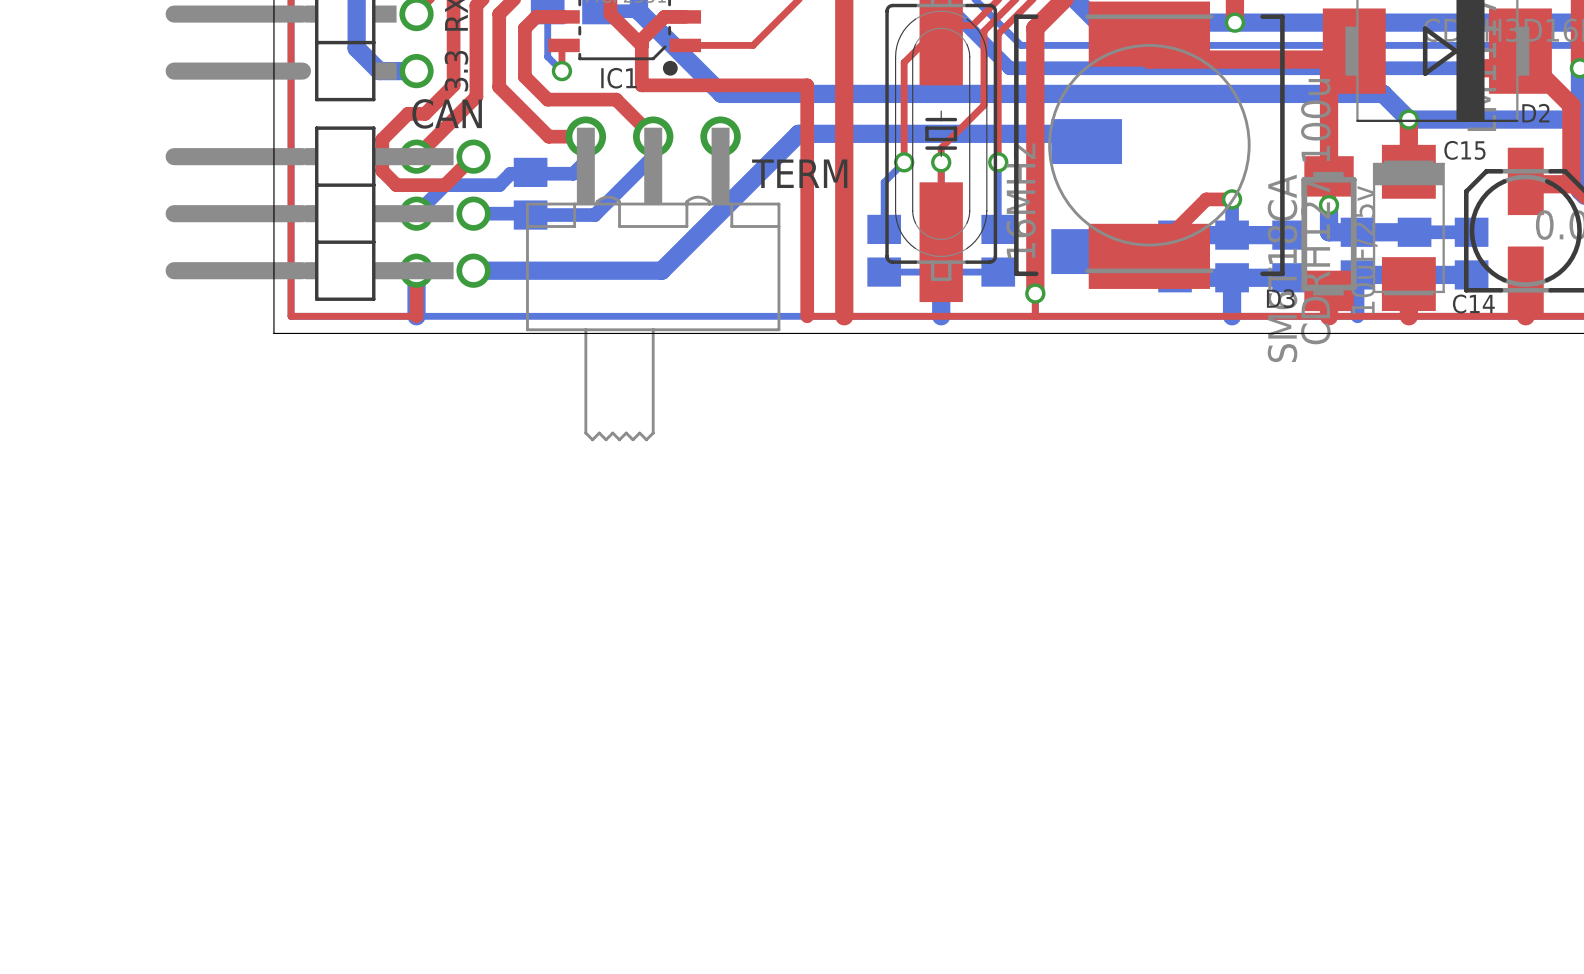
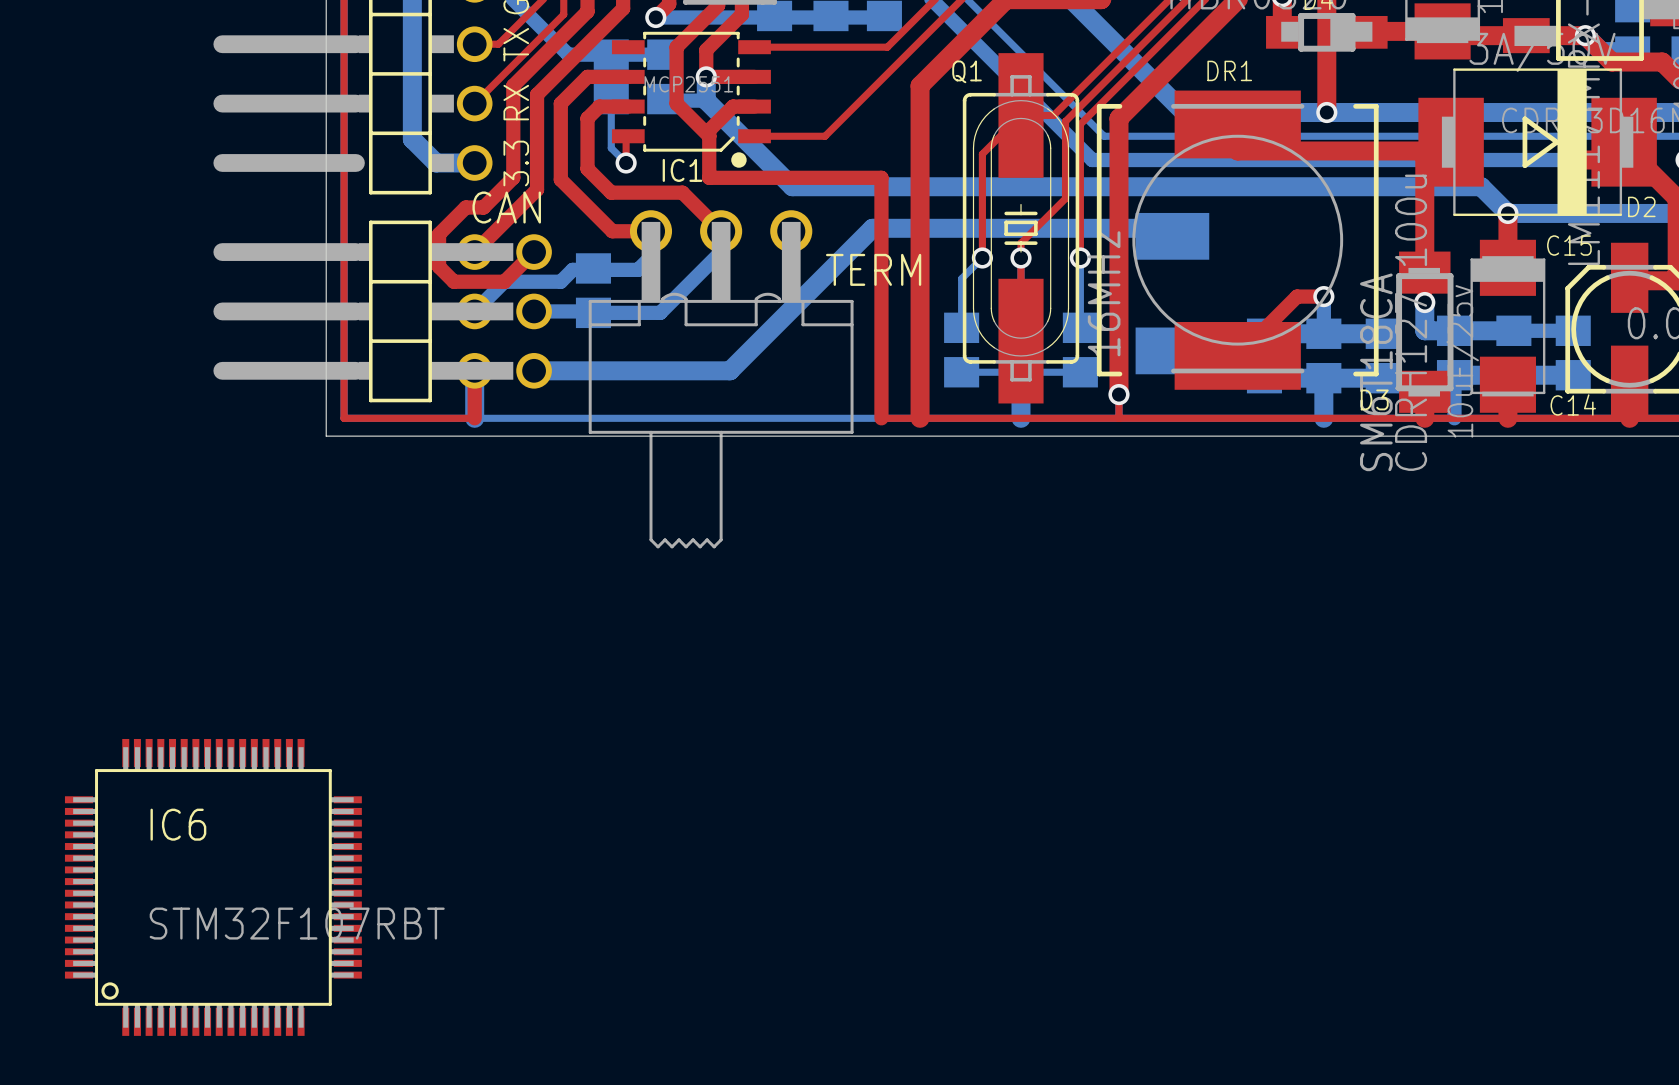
IC6: none -> STM32F107RBT (213, 887)

